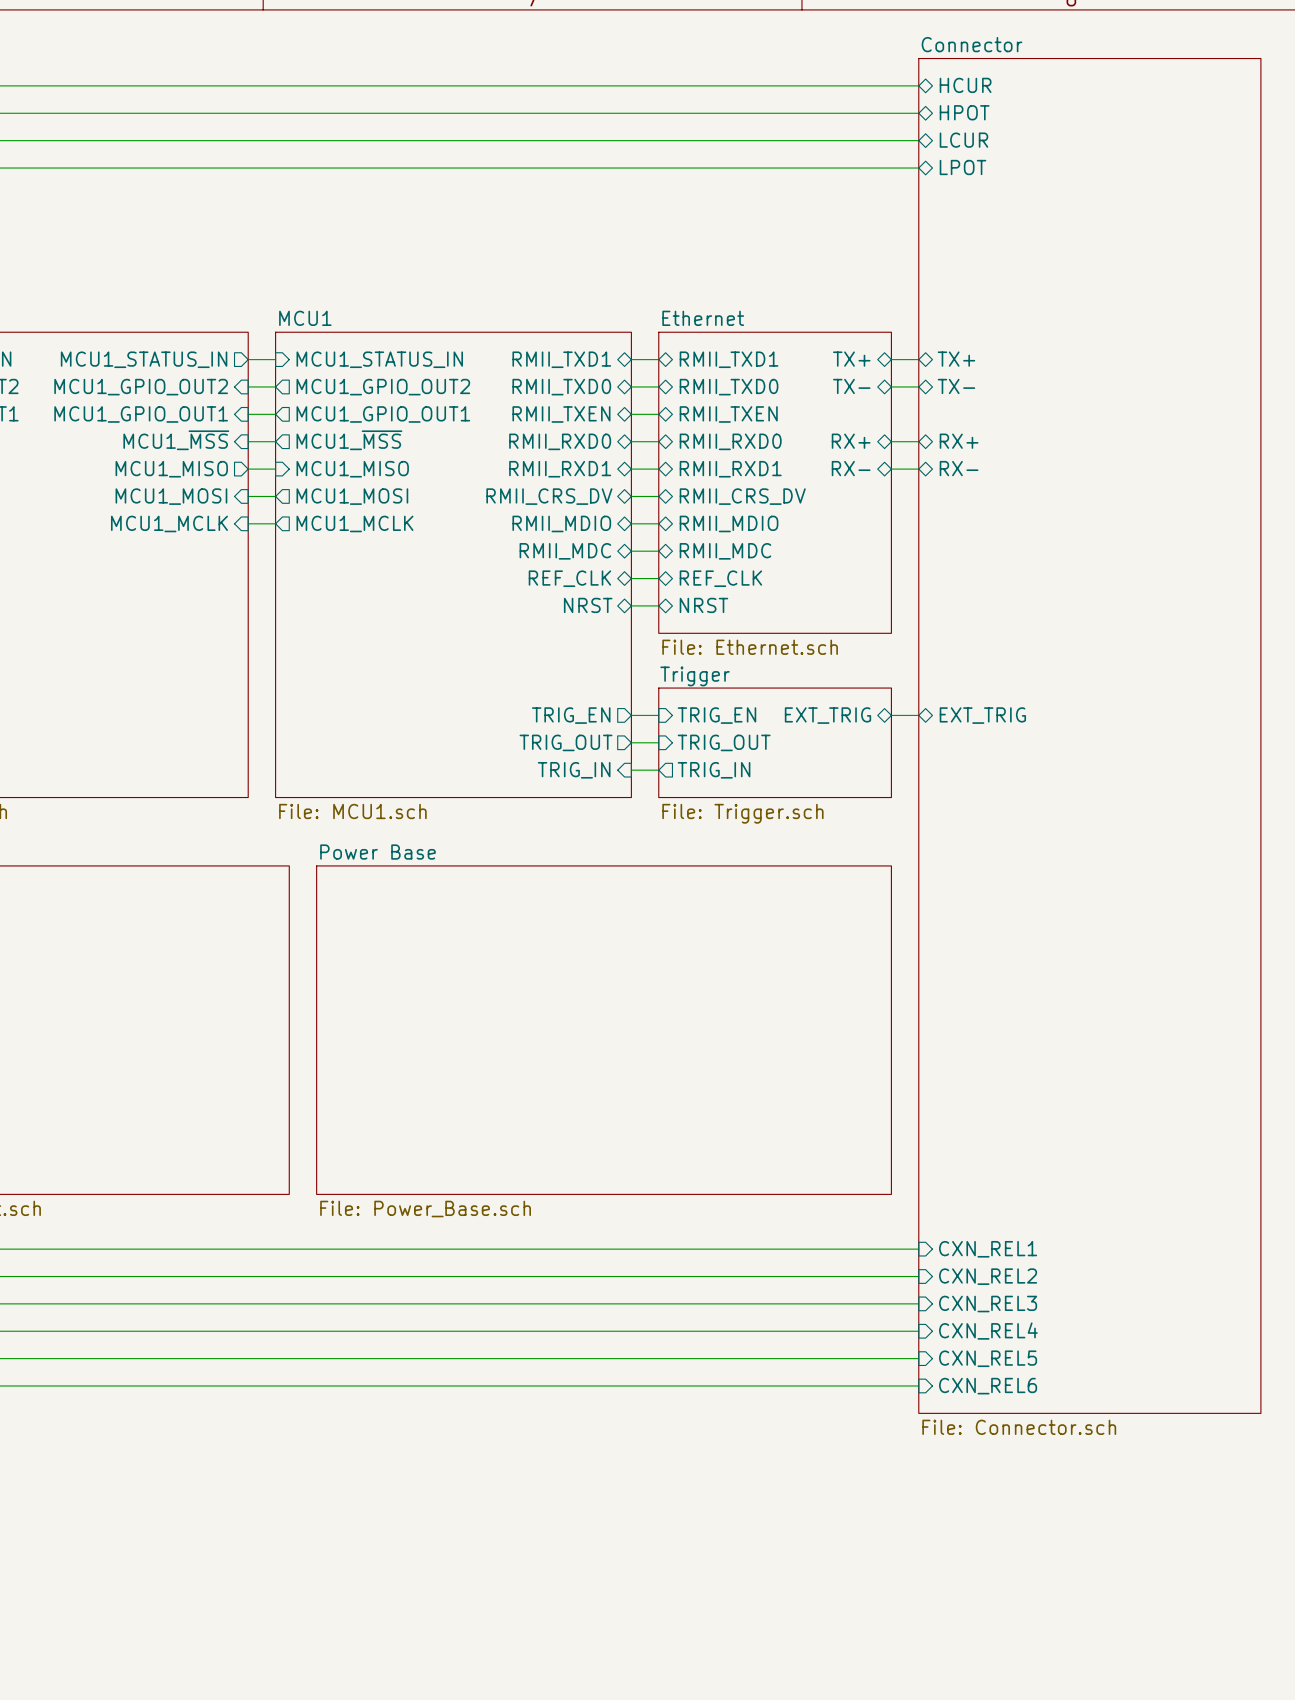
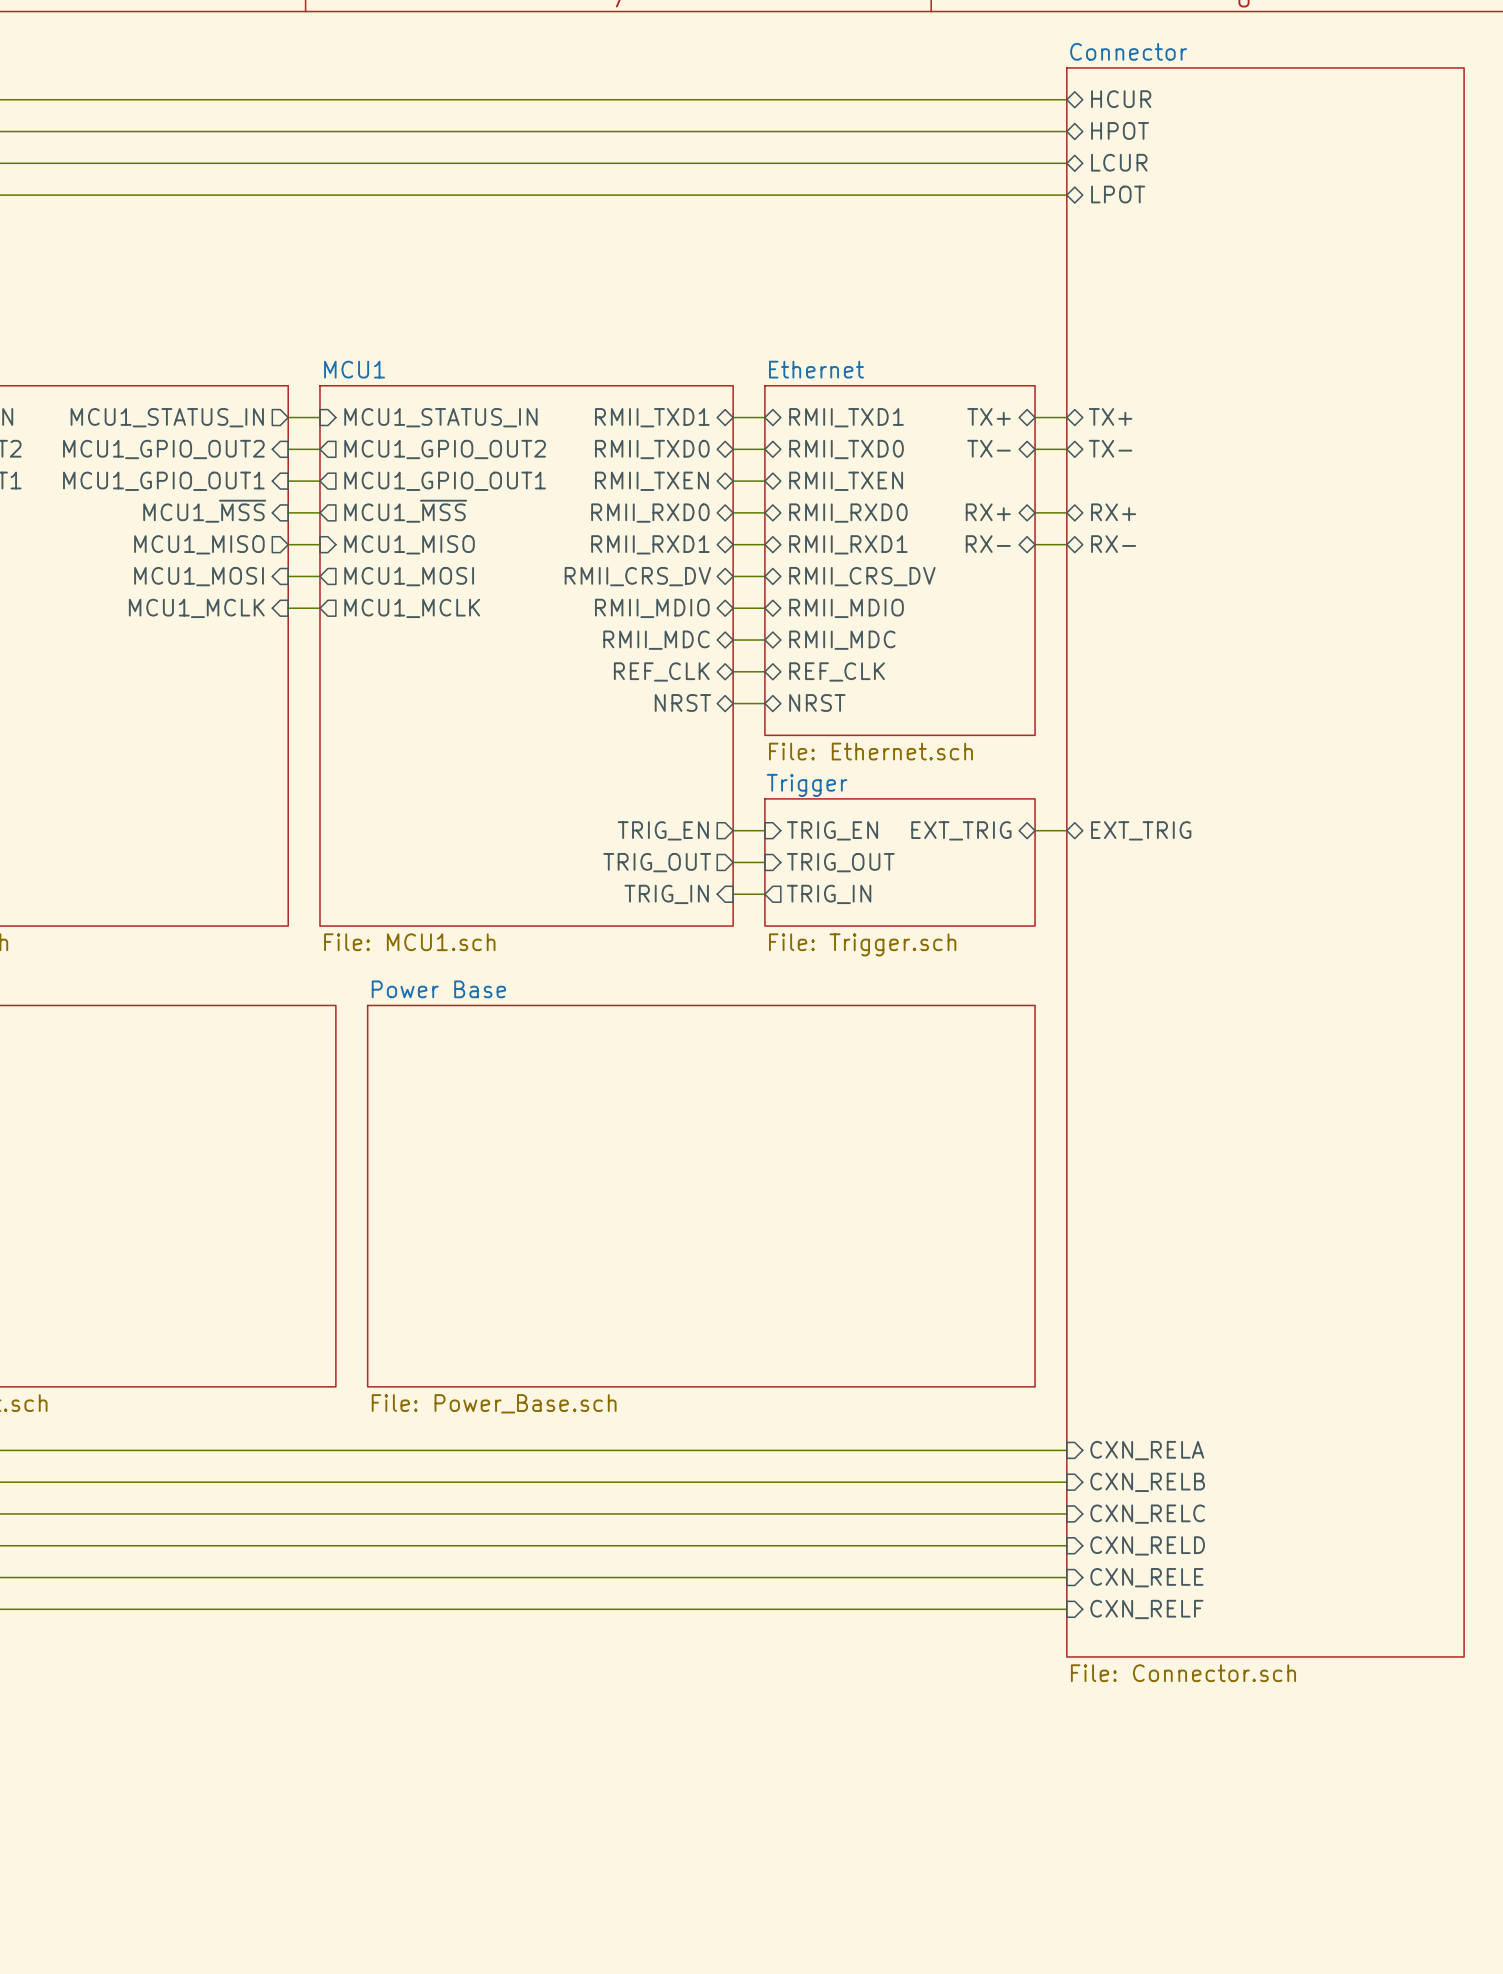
sheet Connector shape: [918, 58, 1261, 1414] -> [1066, 67, 1465, 1657]
sheet pin: CXN_REL1 (988, 1249) -> CXN_RELA (1147, 1450)
sheet pin: CXN_REL2 (988, 1276) -> CXN_RELB (1147, 1482)
sheet pin: CXN_REL3 (988, 1304) -> CXN_RELC (1147, 1514)
sheet pin: CXN_REL4 (988, 1331) -> CXN_RELD (1147, 1545)
sheet pin: CXN_REL5 (988, 1358) -> CXN_RELE (1146, 1577)
sheet pin: CXN_REL6 (988, 1386) -> CXN_RELF (1146, 1609)

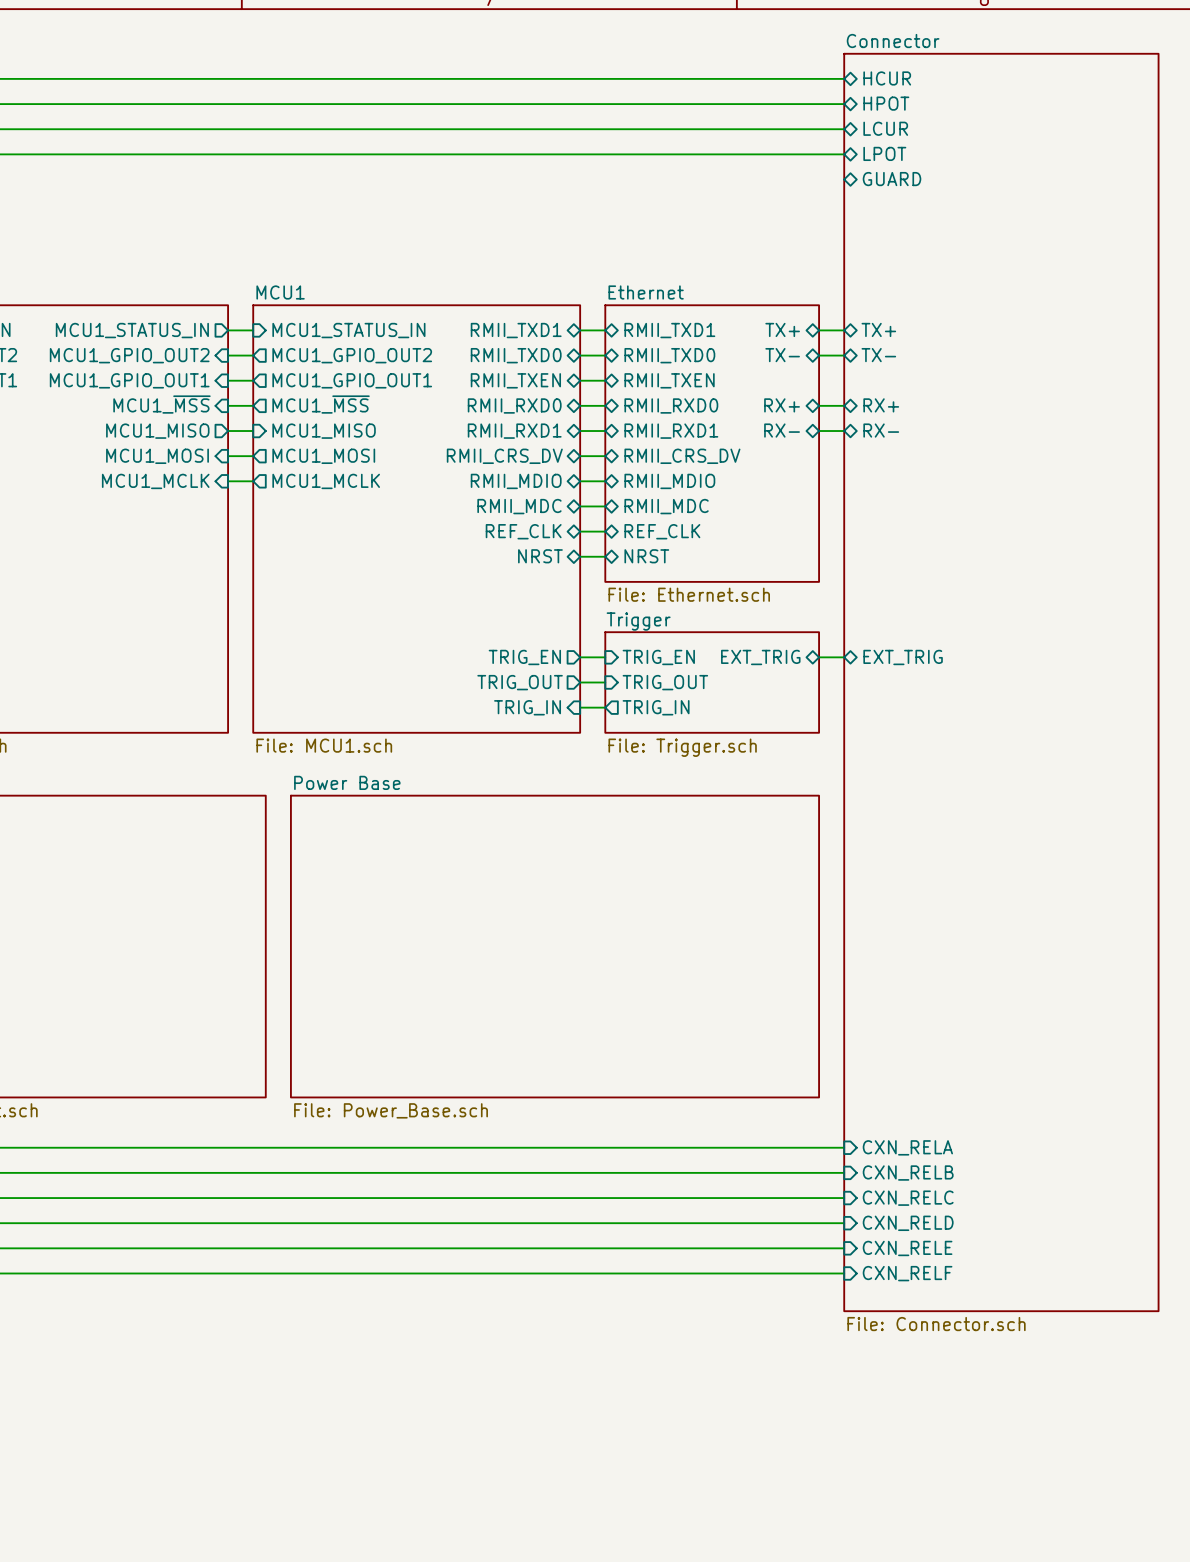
sheet pin: none -> GUARD (892, 179)

